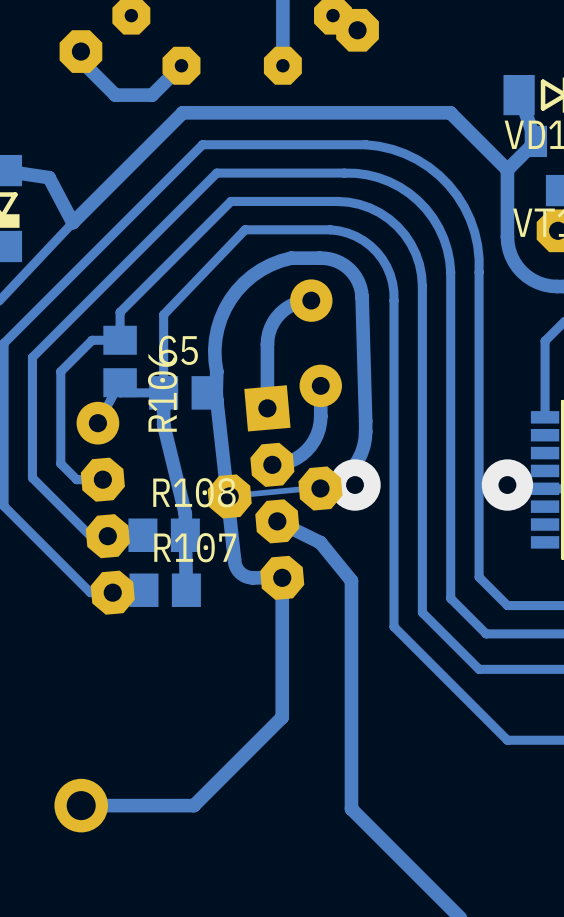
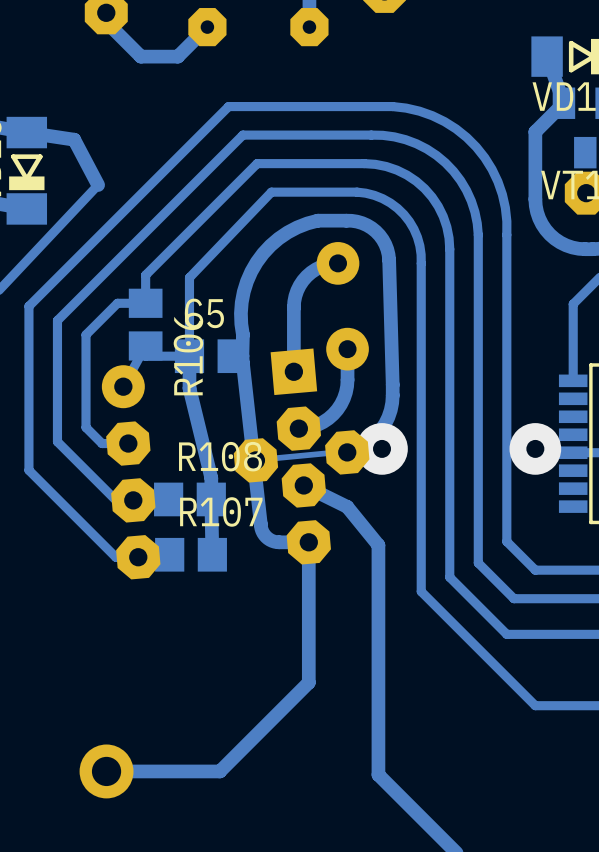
track: (507, 169) (450, 112) (182, 112) (72, 222) -> none

